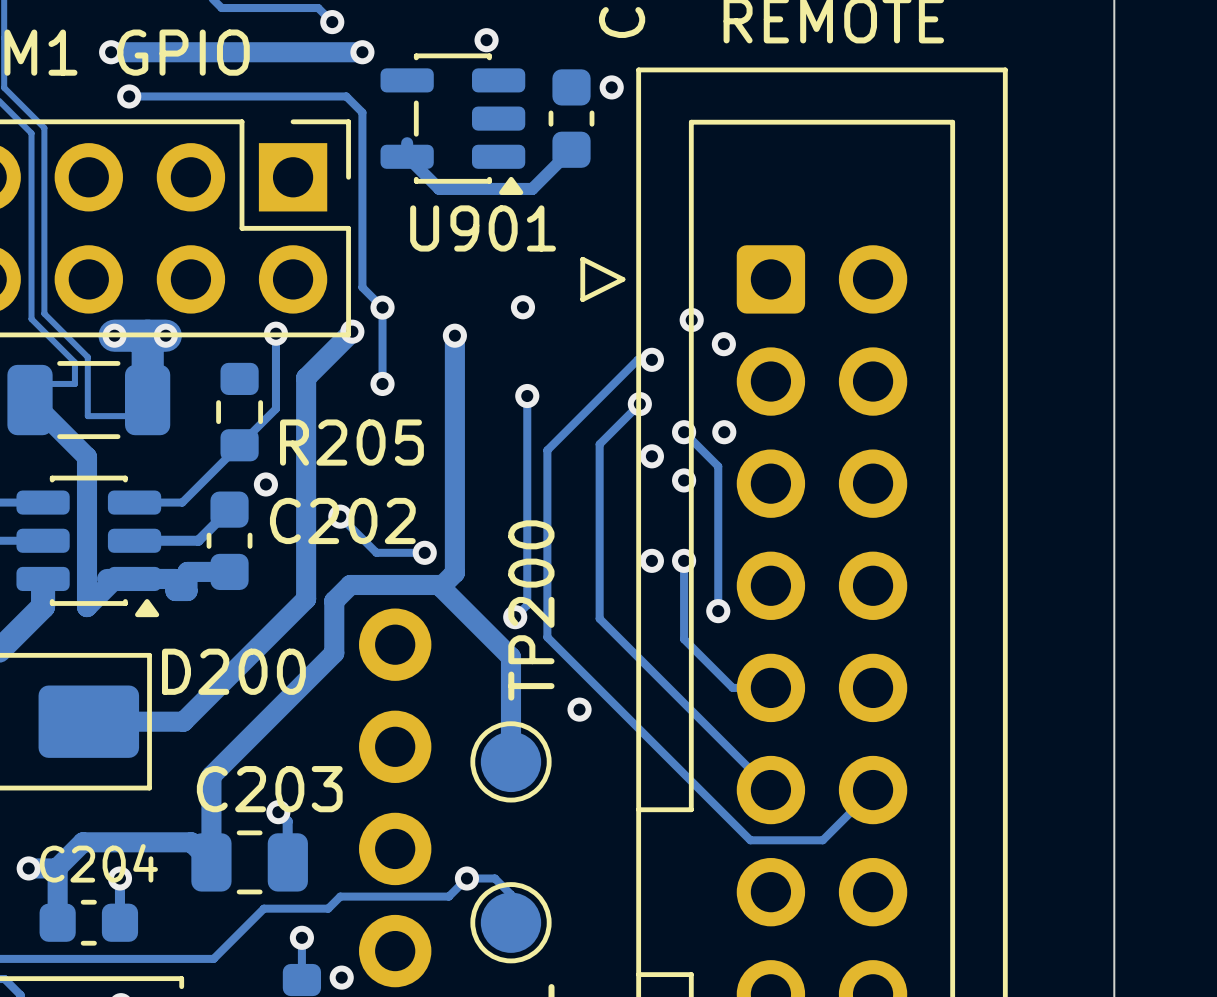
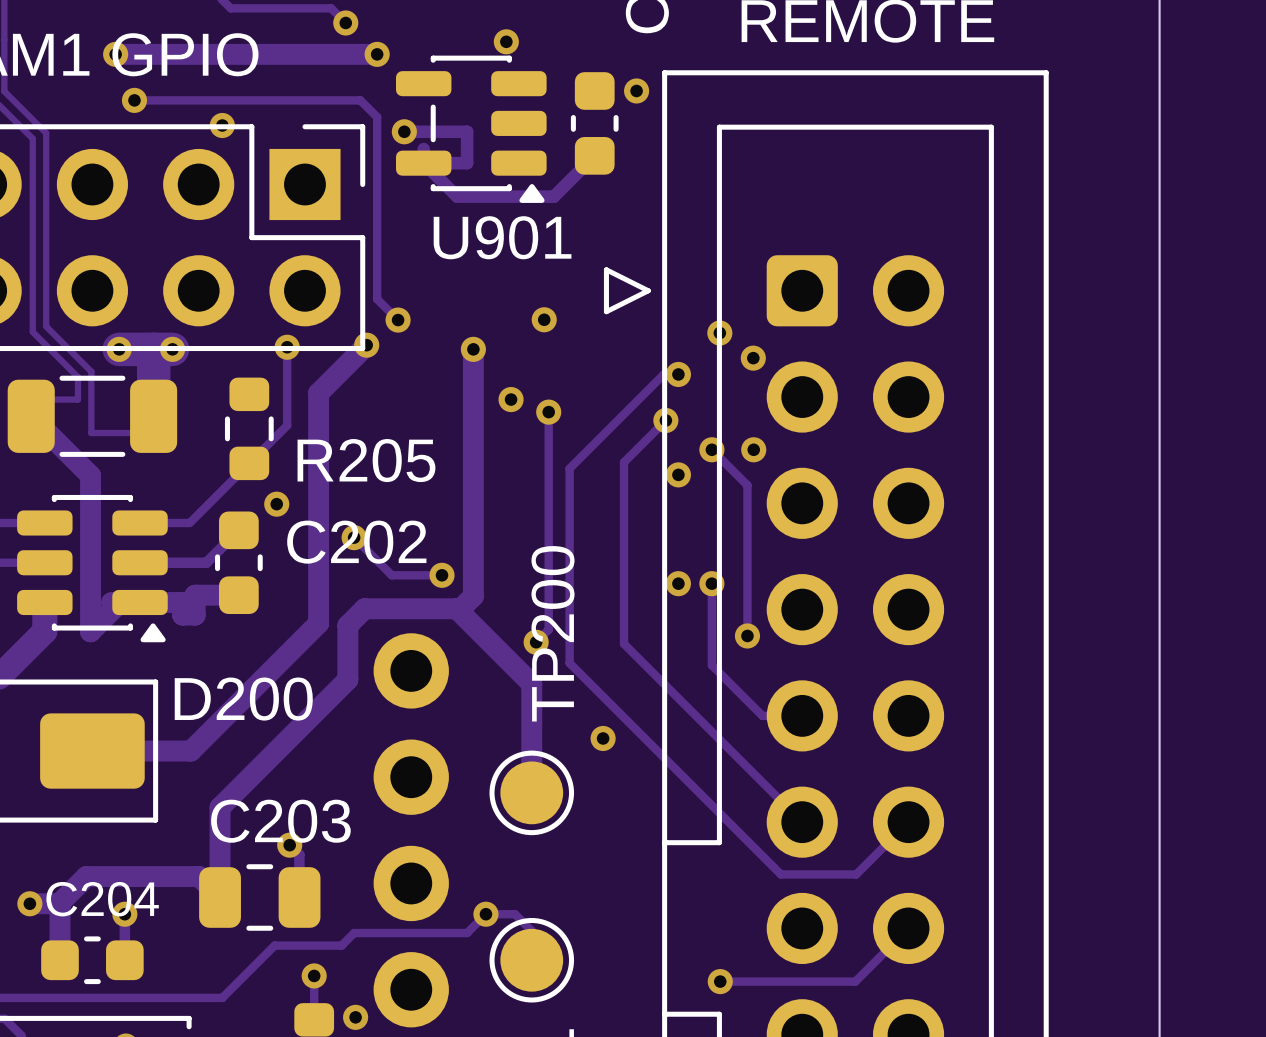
via: none -> (222, 125)
track: none -> (404, 131) (467, 131) (467, 163) (423, 163)
via: none -> (404, 131)
track: (382, 307) (382, 383) -> none
via: (382, 383) -> none
via: none -> (511, 399)
via: (684, 480) -> none
track: none -> (908, 928) (855, 981) (720, 981)
via: none -> (720, 981)

